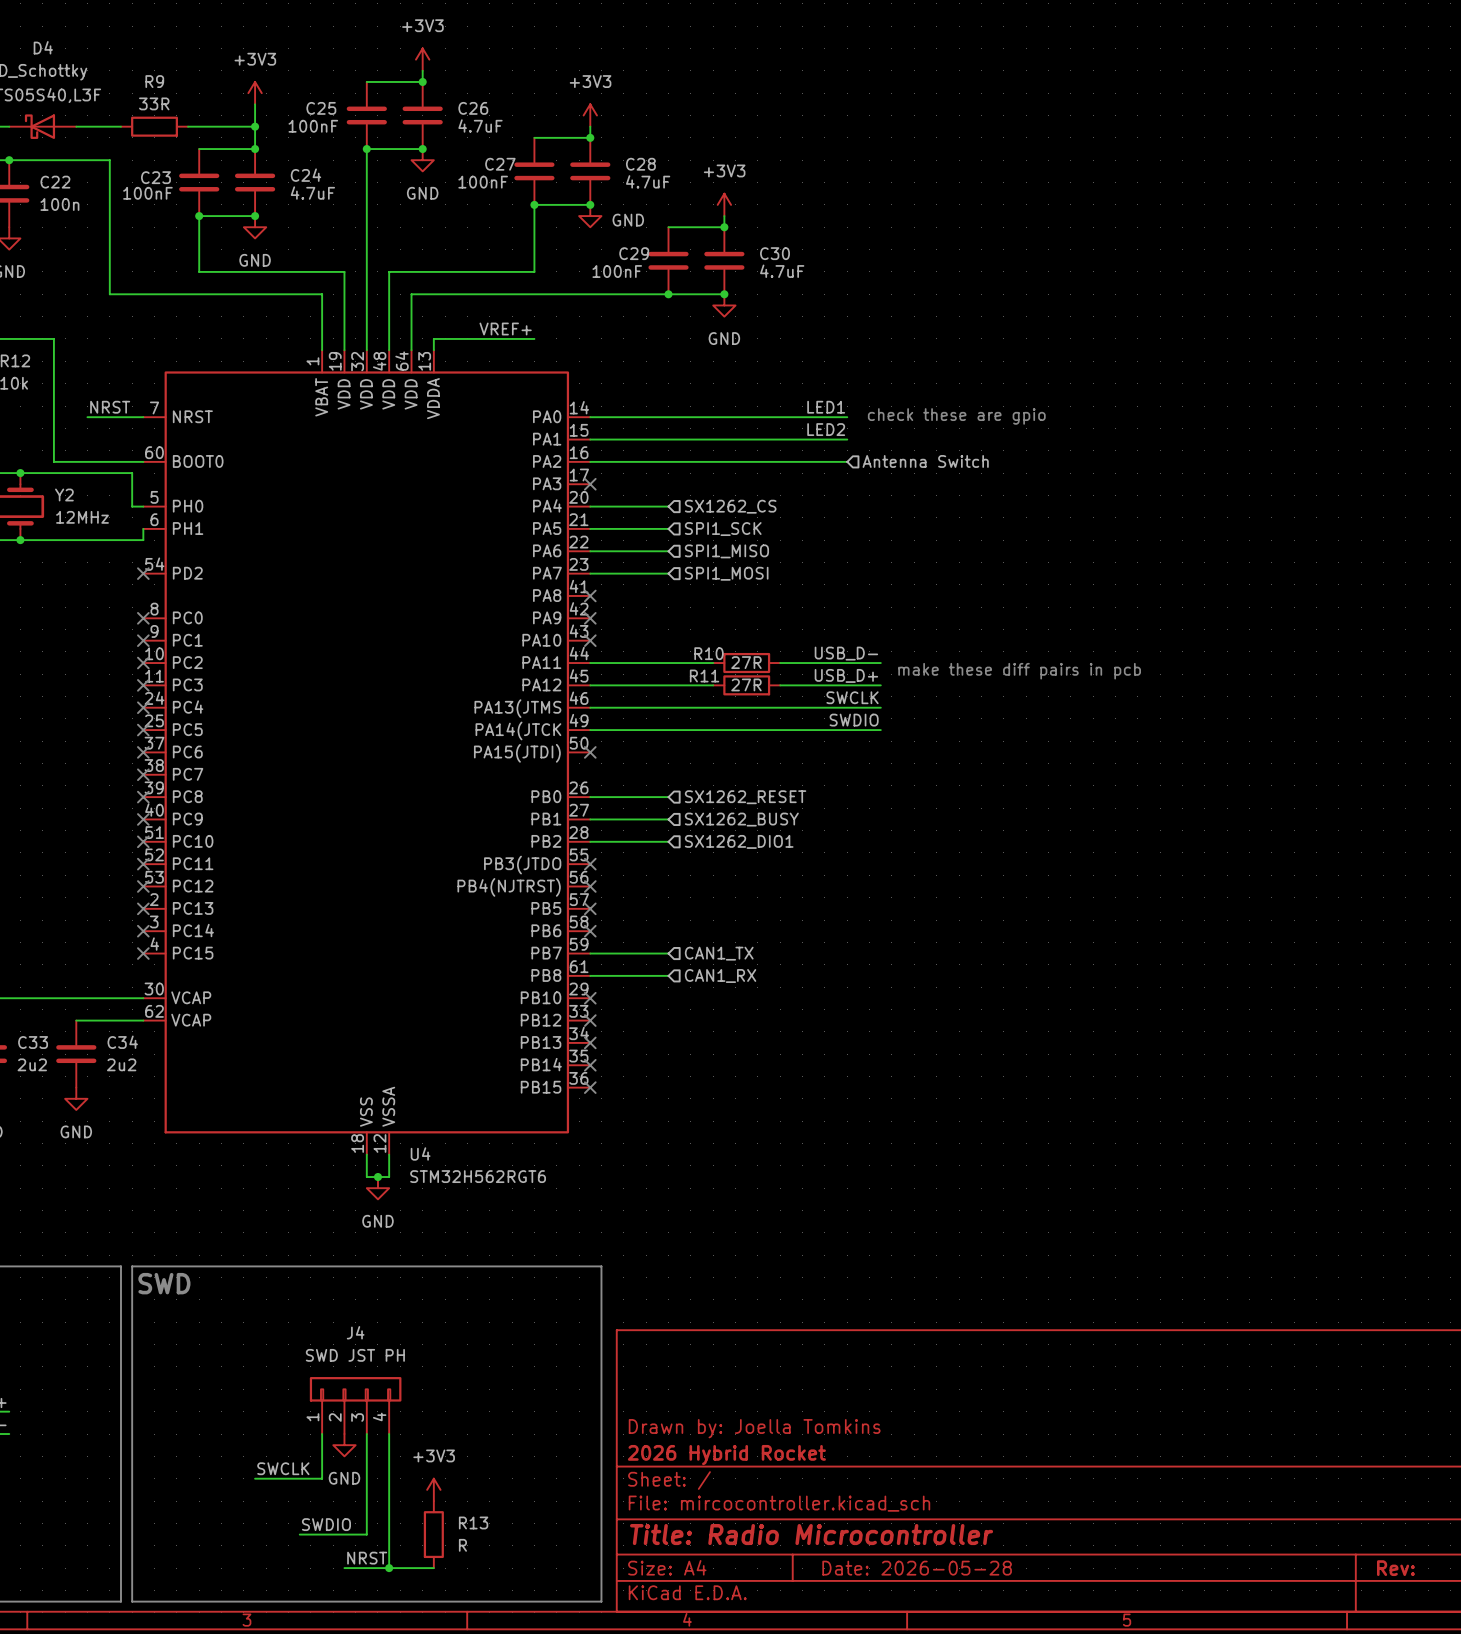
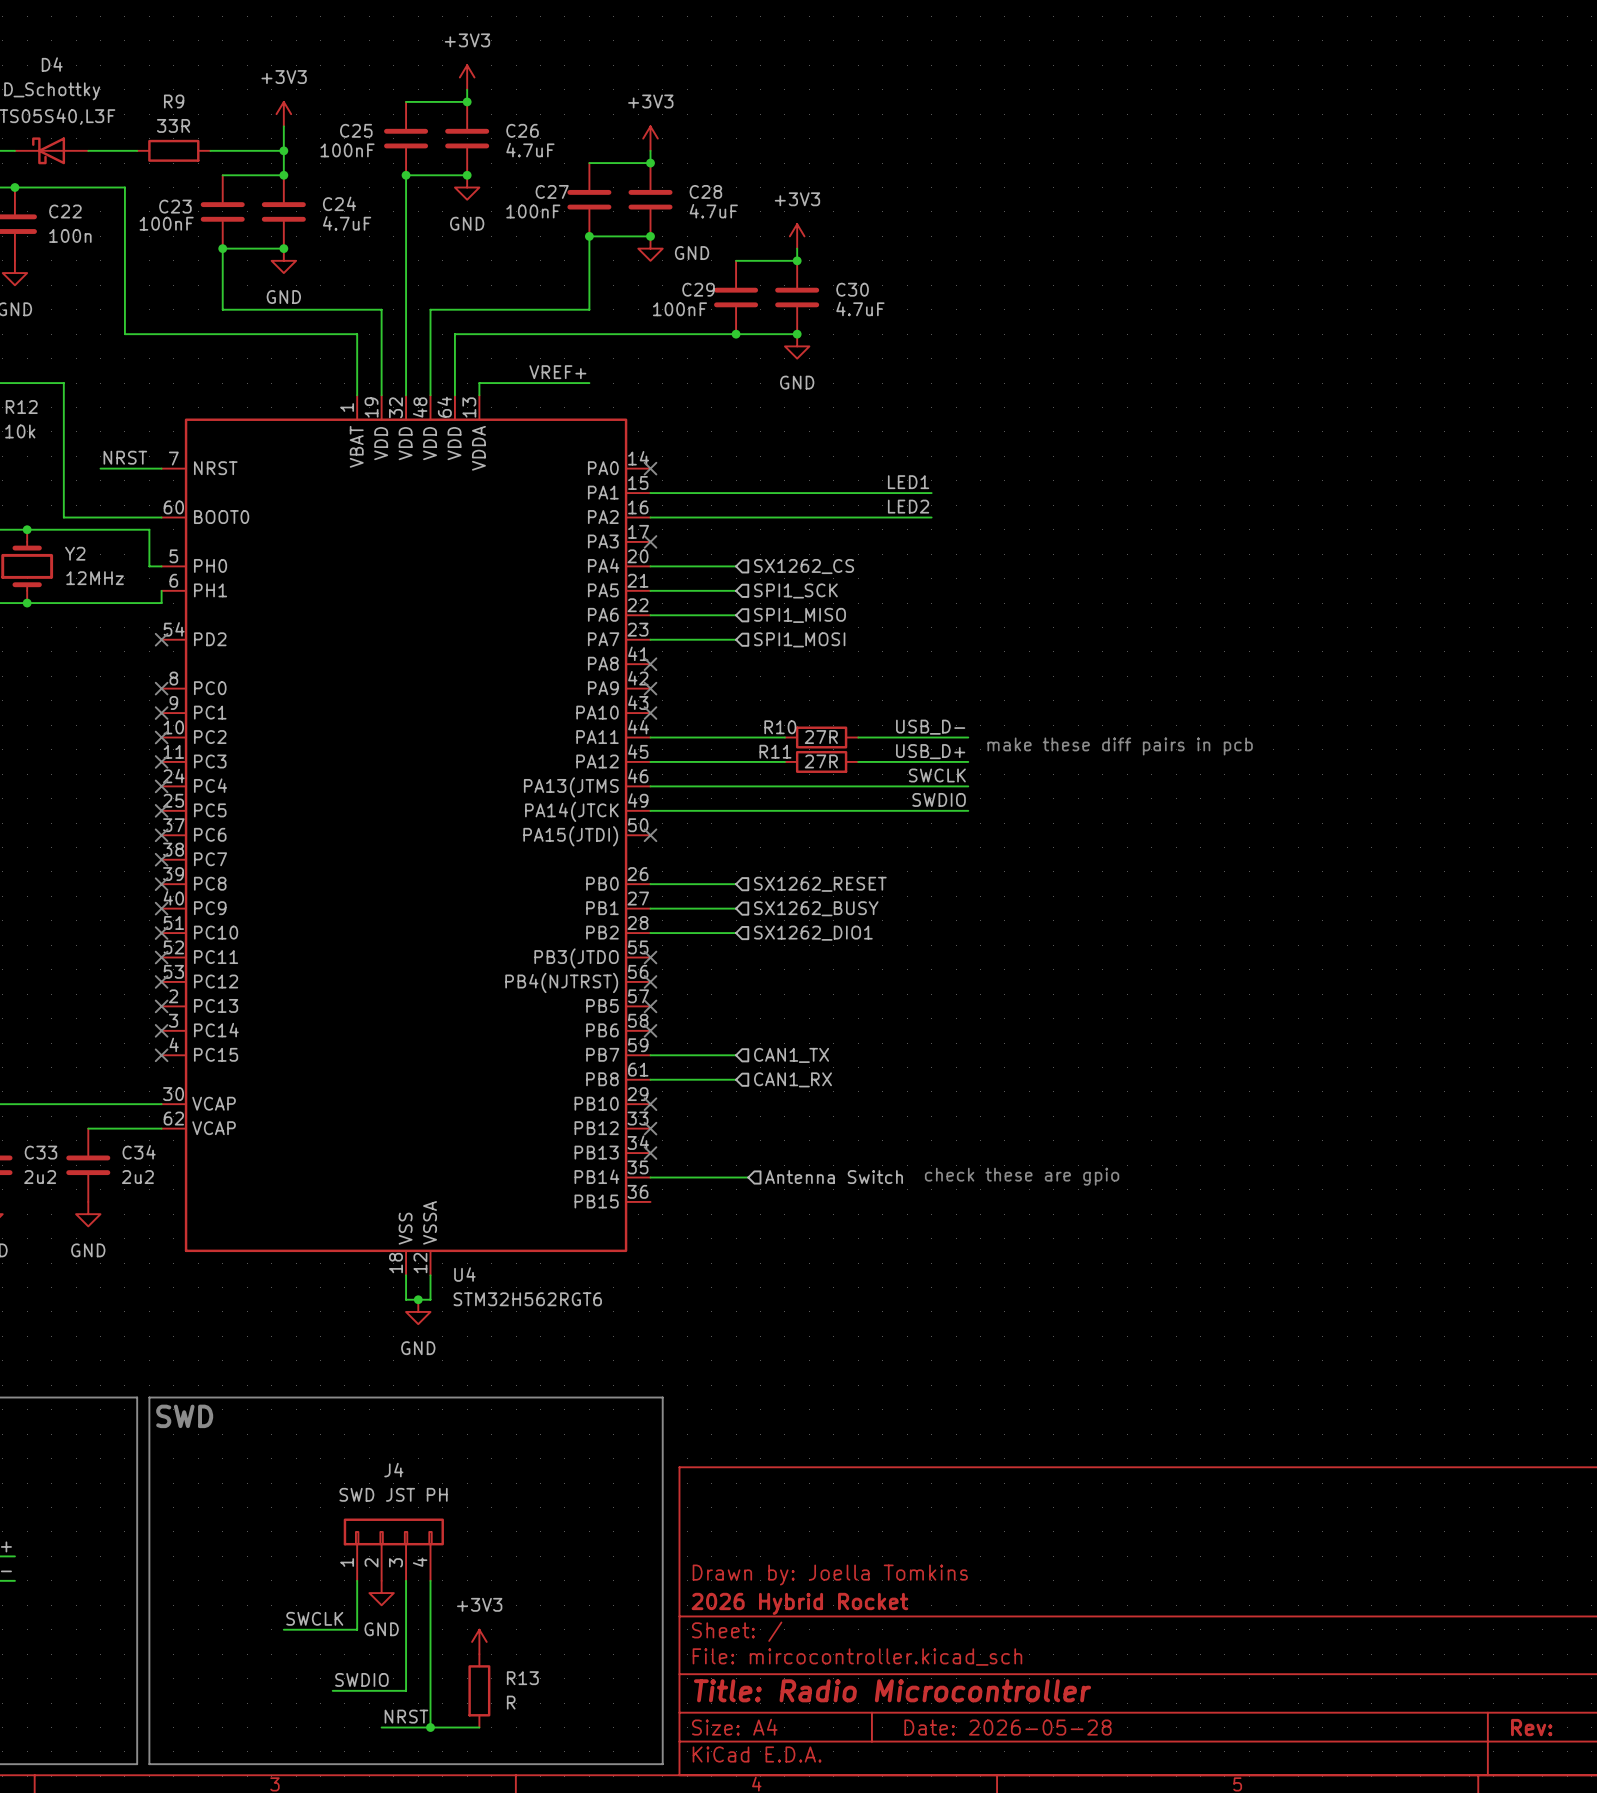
label: LED1 (826, 407) -> none
text: check these are gpio (956, 416) -> none
wire: (590, 417) (847, 417) -> none
no-connect mark: none -> (650, 468)
label: LED2 (826, 429) -> LED1 (908, 482)
label: none -> LED2 (908, 506)
hierarchical label: Antenna Switch (925, 461) -> none
hierarchical label: none -> Antenna Switch (834, 1177)
text: none -> check these are gpio (1022, 1176)
wire: none -> (650, 1177) (748, 1177)
no-connect mark: (590, 1065) -> none
no-connect mark: (590, 1087) -> none

